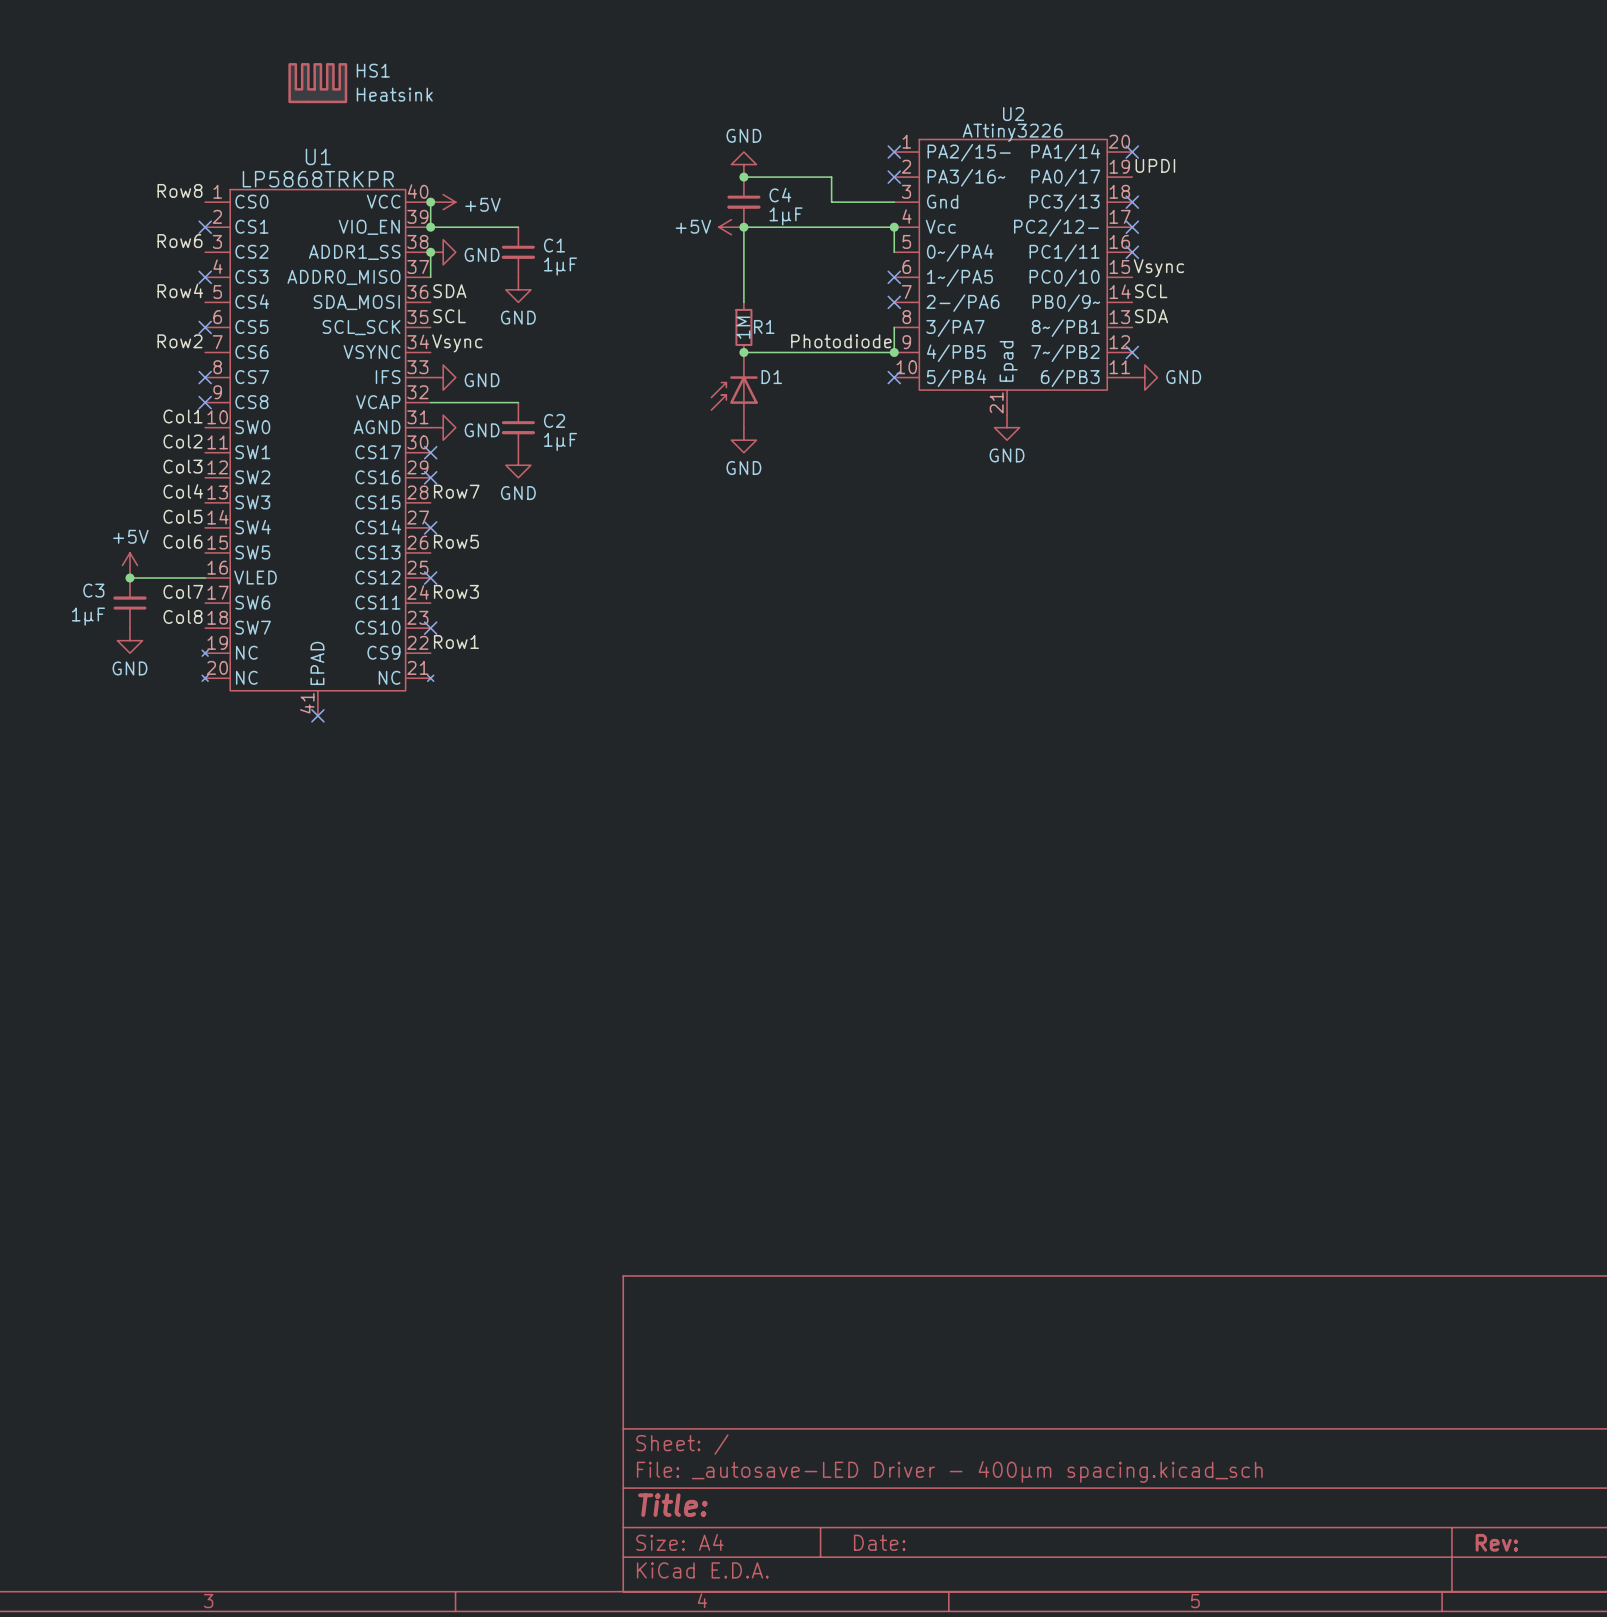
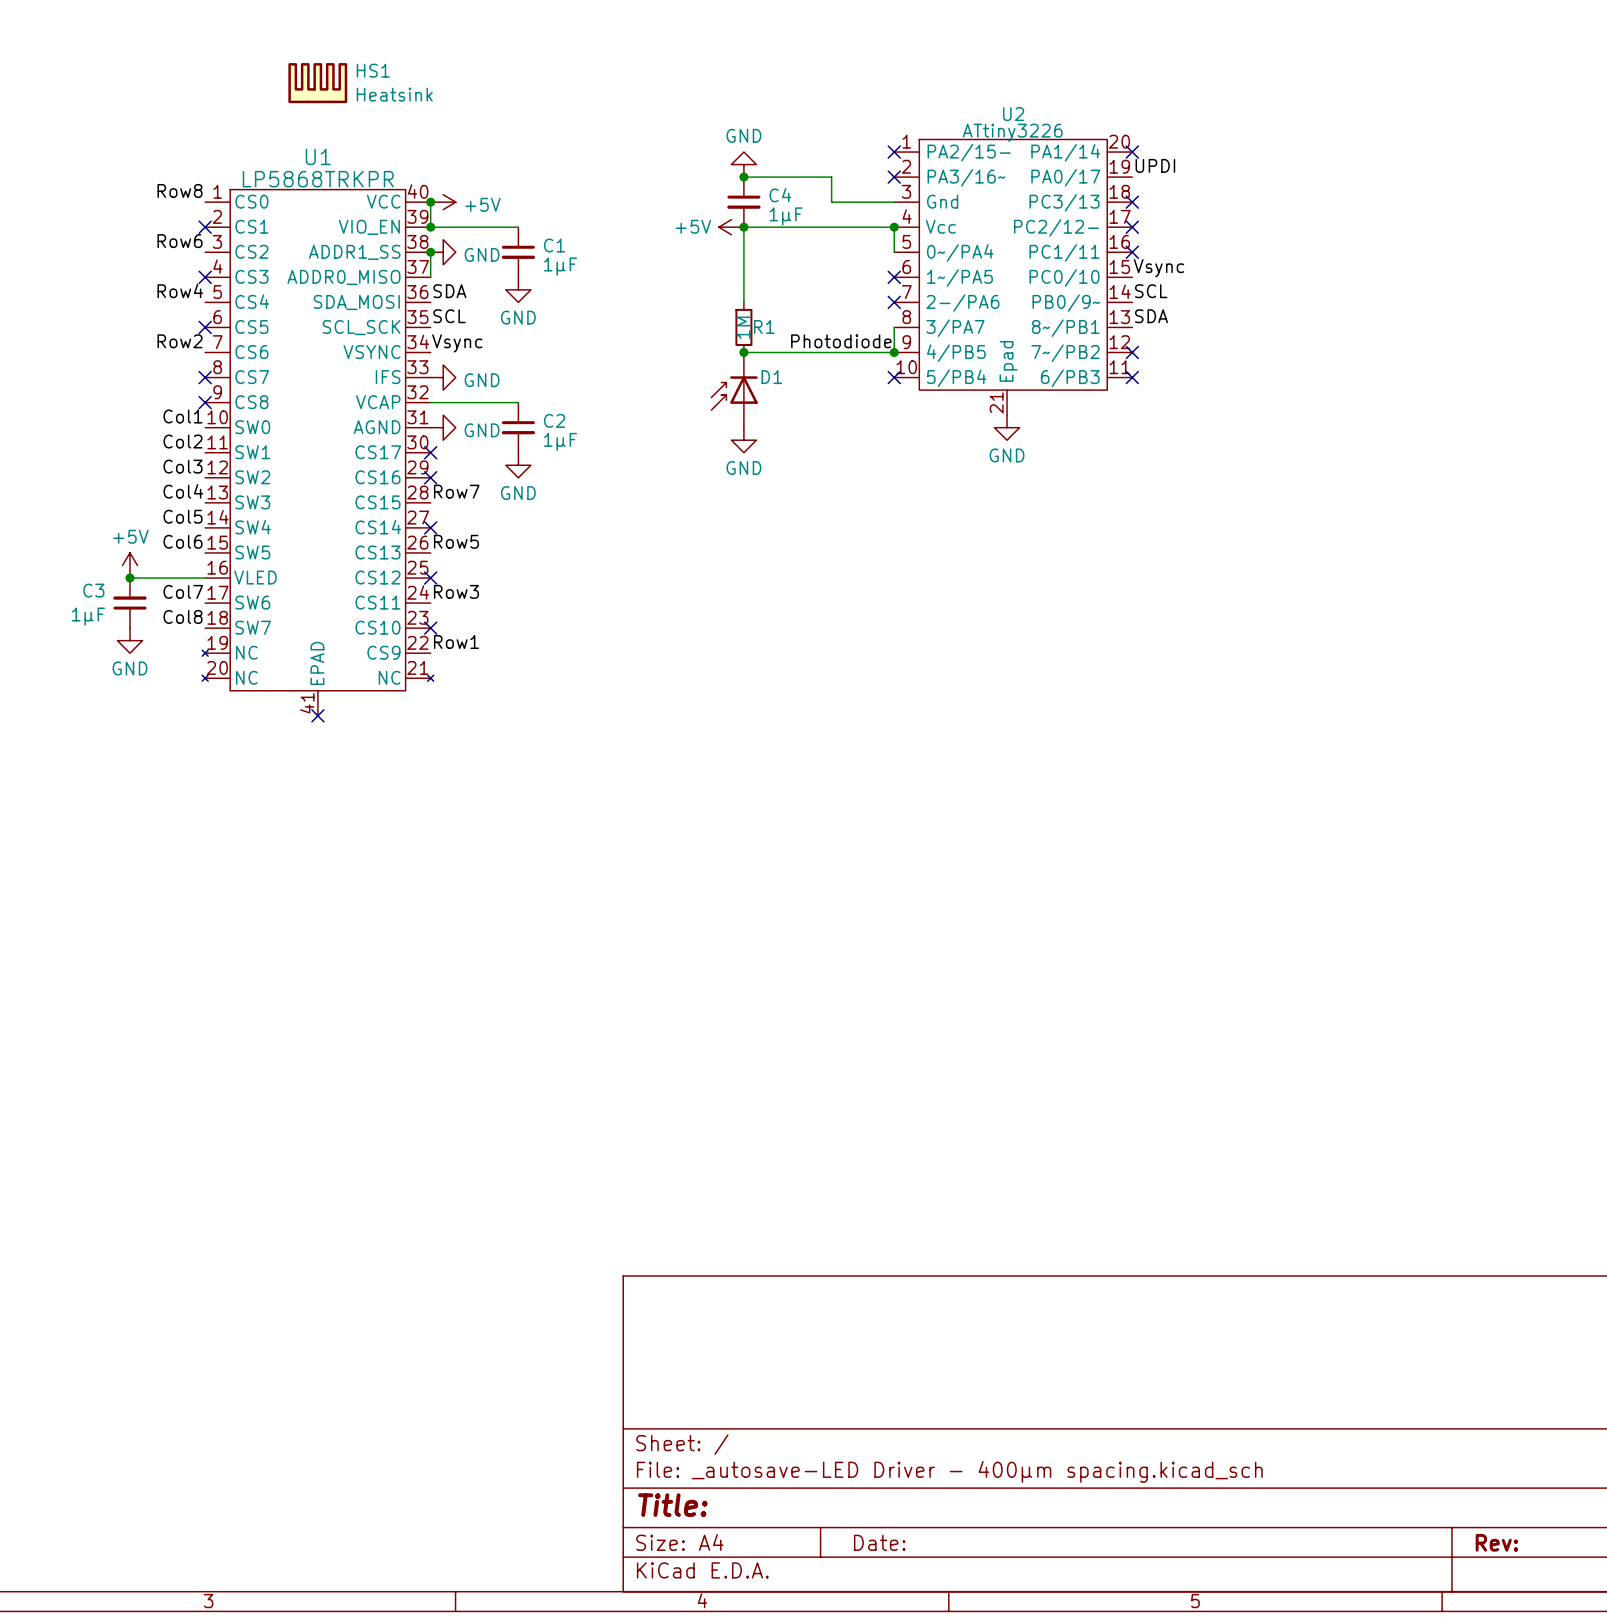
no-connect mark: none -> (1132, 377)
power symbol: GND (1144, 377) -> none

